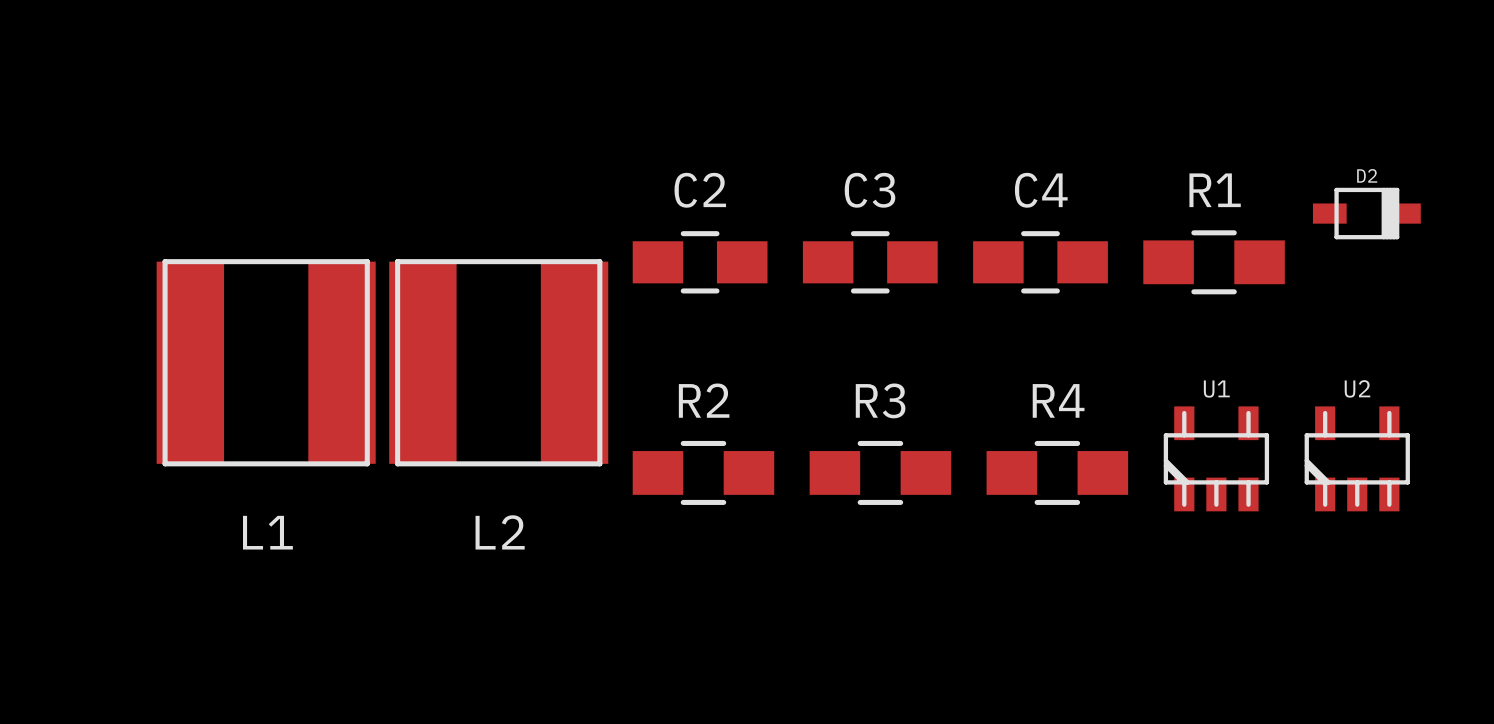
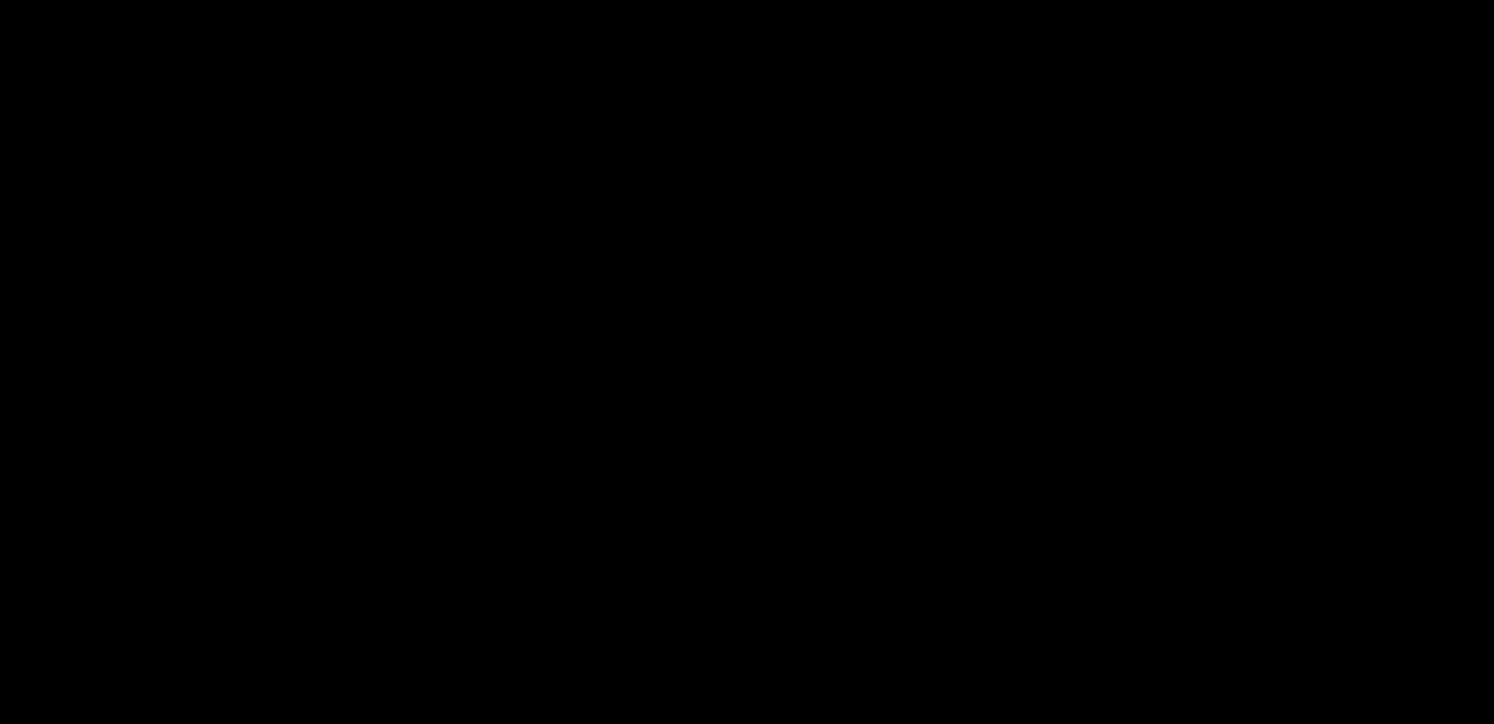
D2: (1366, 213) -> none
C2: (700, 262) -> none
C3: (870, 262) -> none
C4: (1040, 262) -> none
R1: (1214, 262) -> none
L1: (266, 362) -> none
L2: (498, 362) -> none
U1: (1216, 458) -> none
U2: (1357, 458) -> none
R2: (703, 472) -> none
R3: (880, 472) -> none
R4: (1057, 472) -> none

